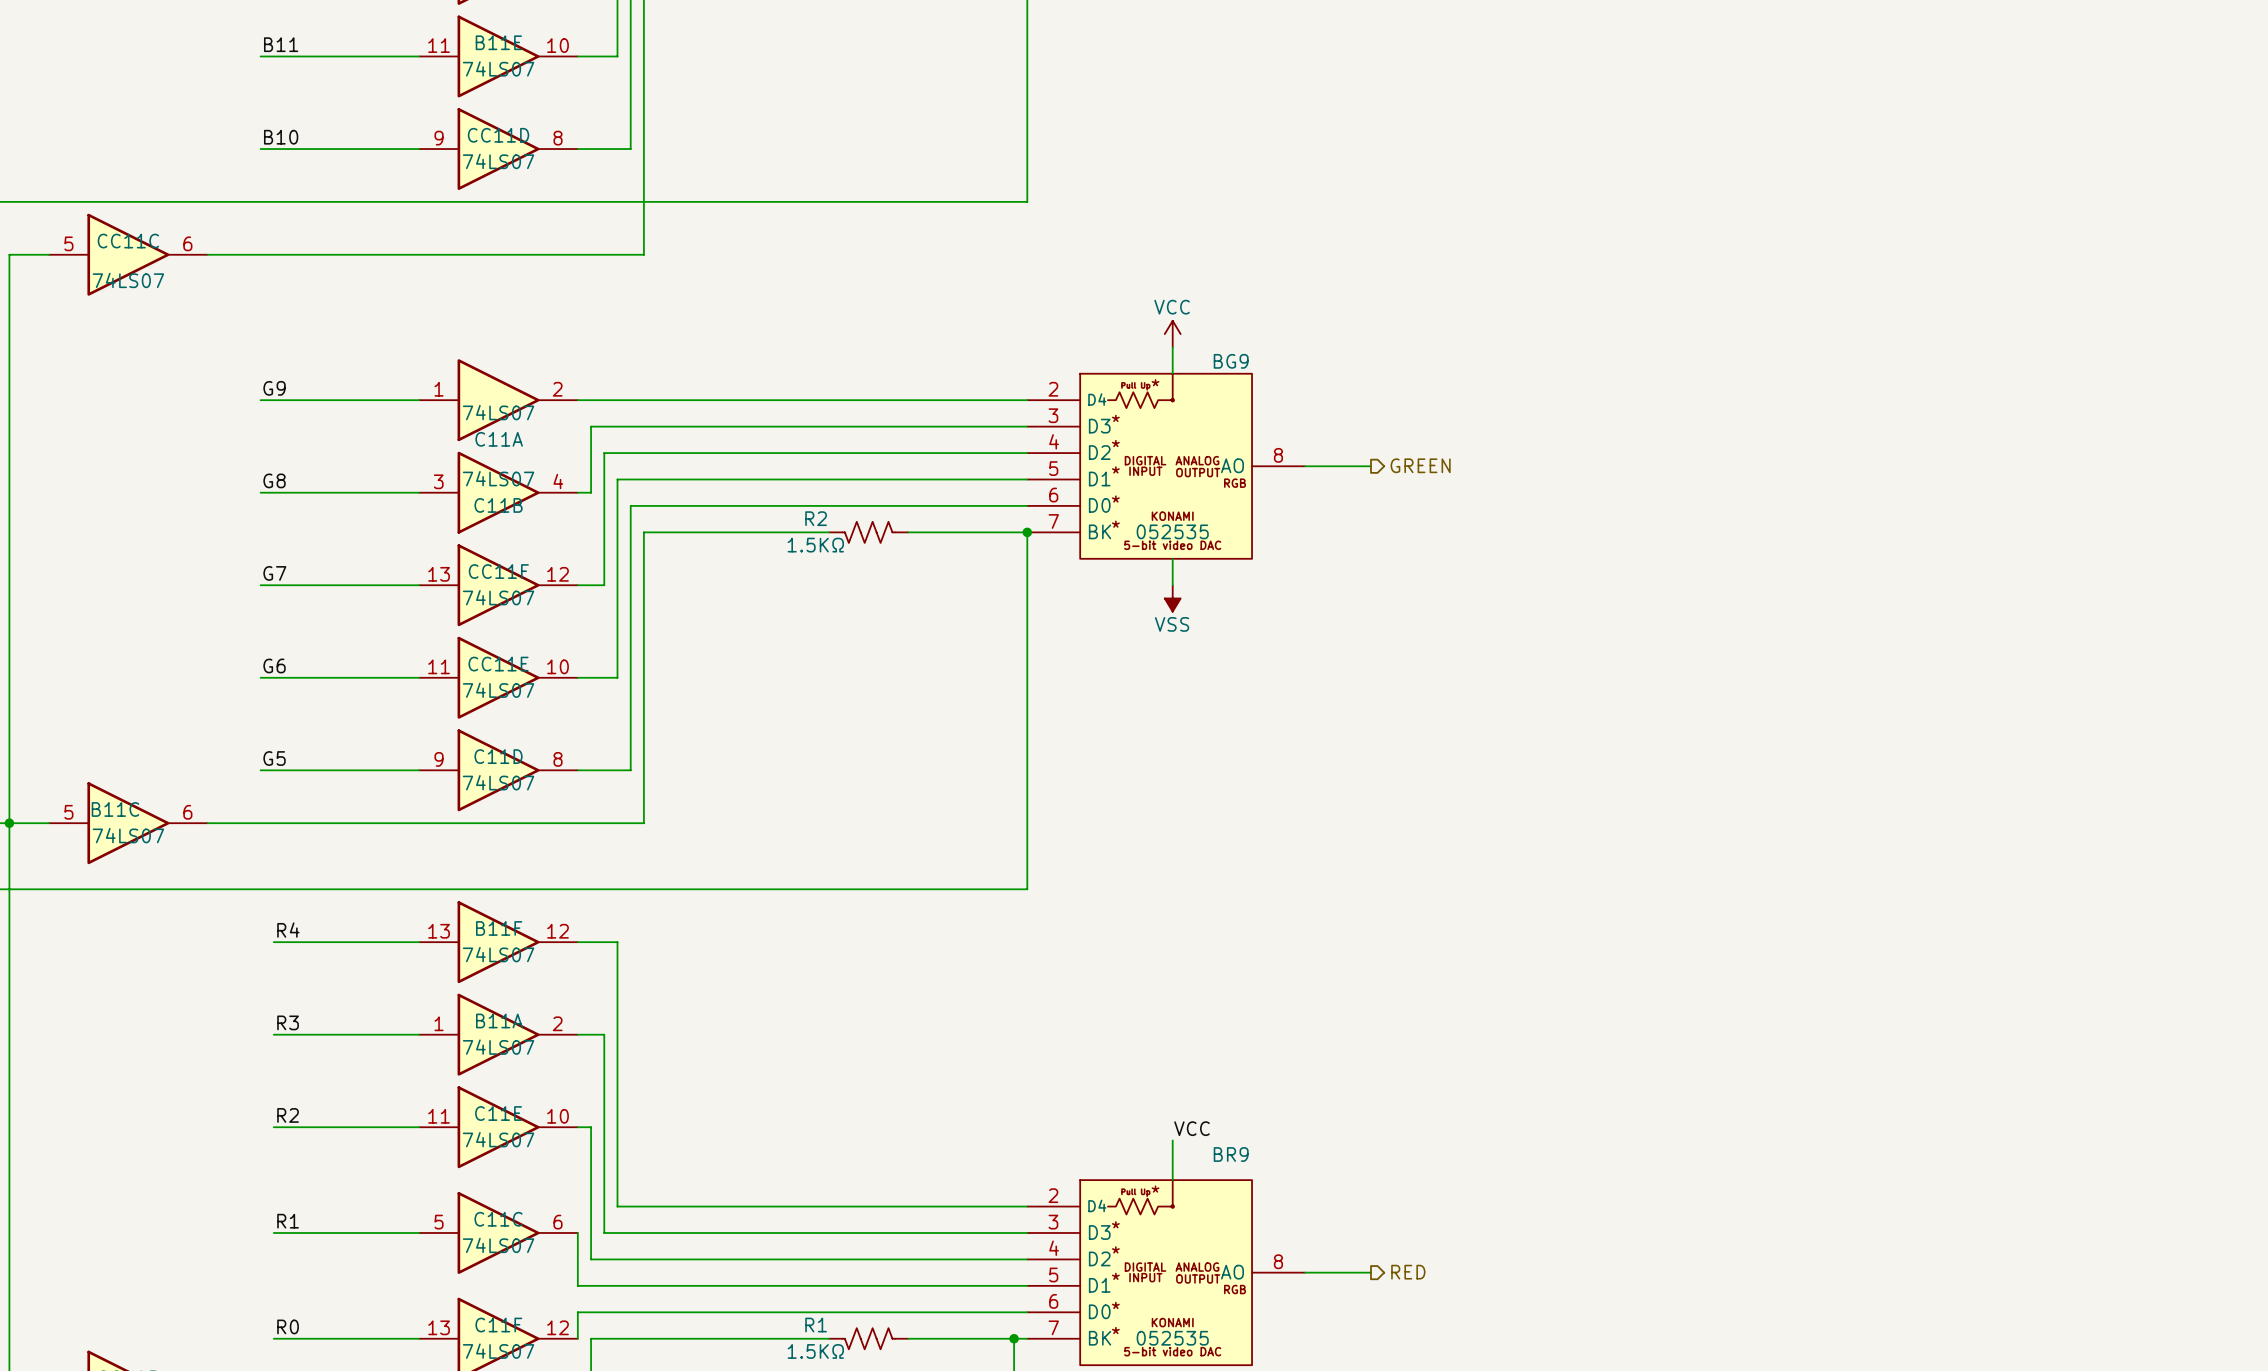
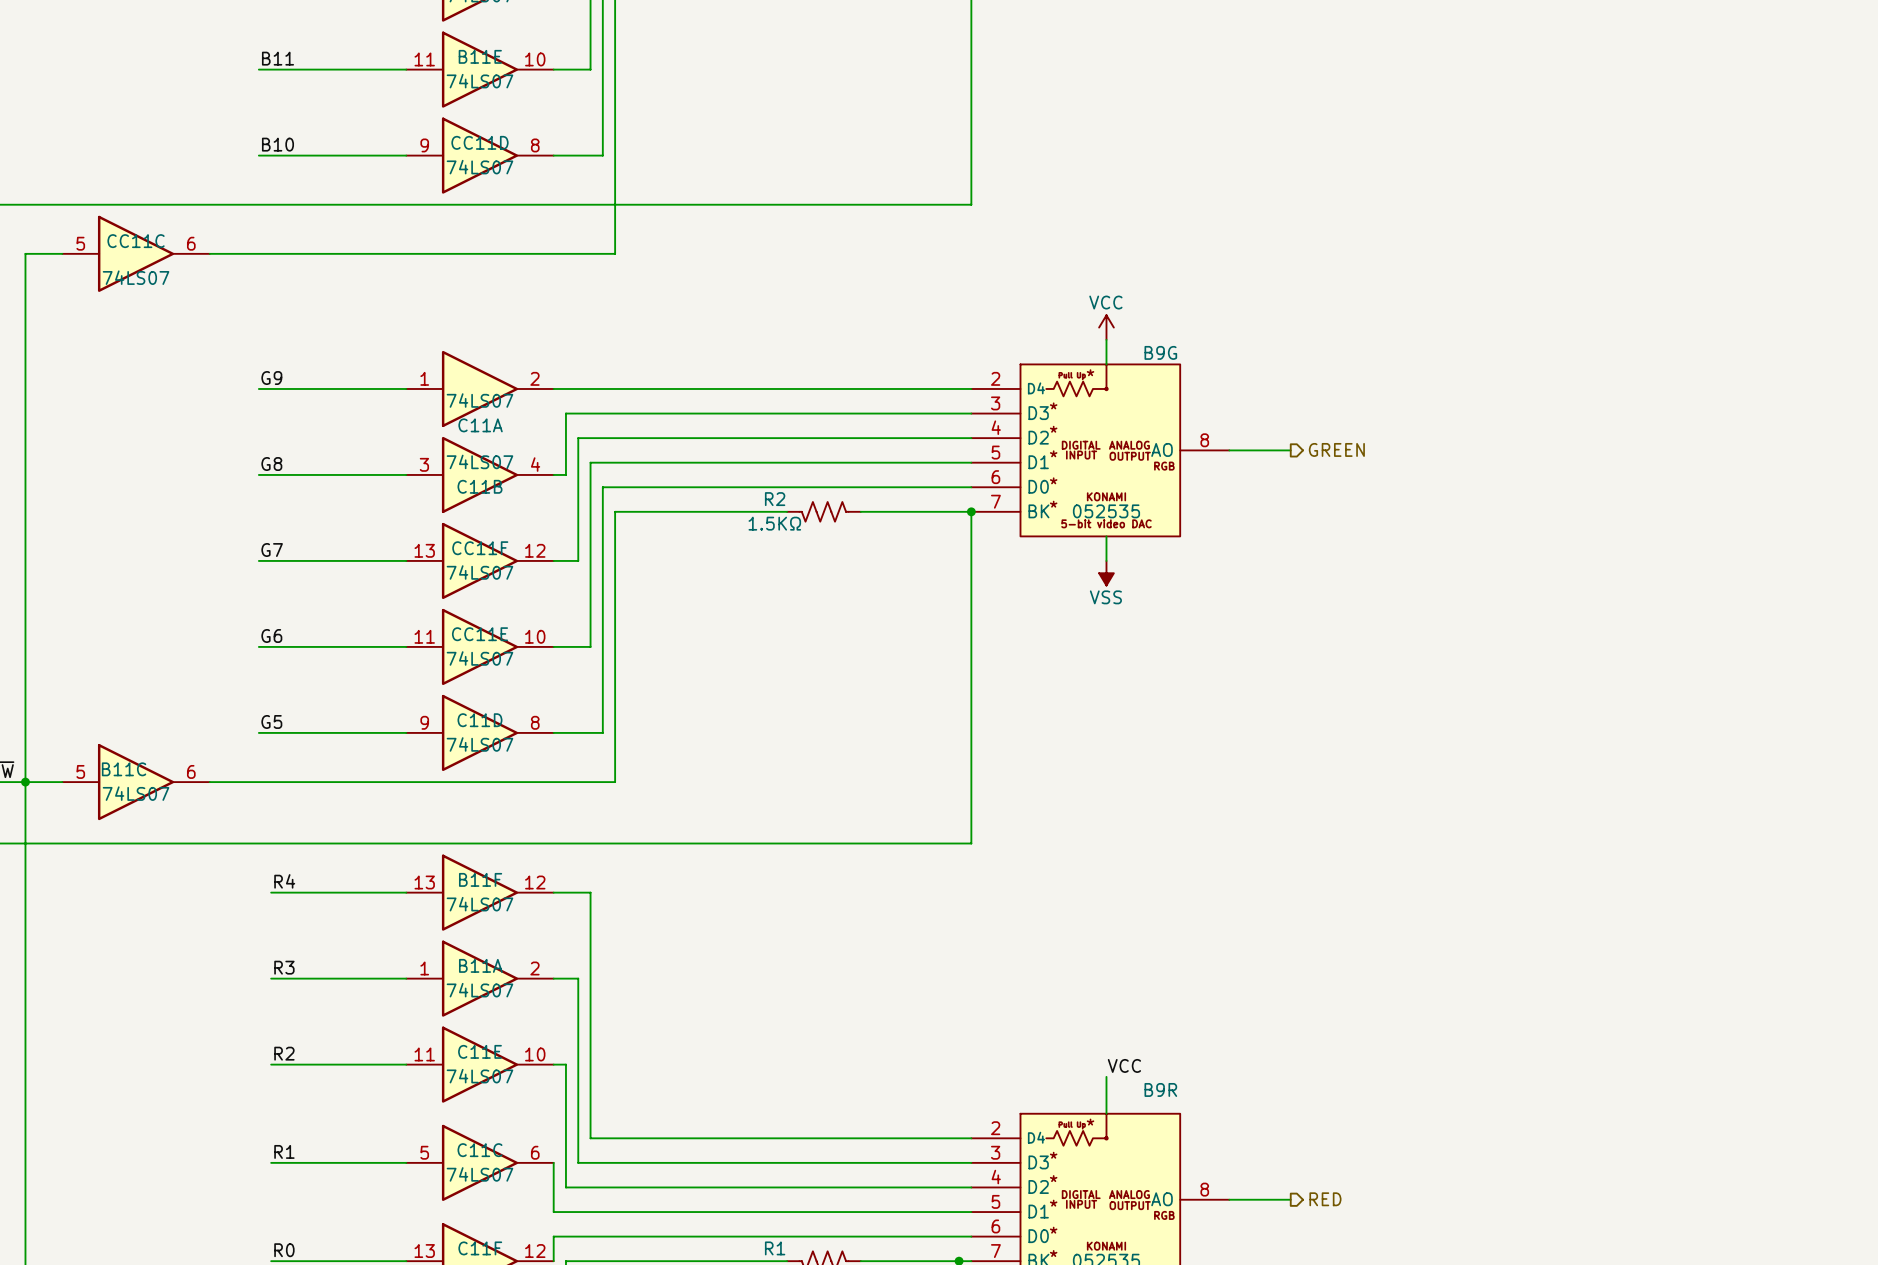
BG9 name: BG9 (1231, 361) -> B9G (1160, 352)
BR9 name: BR9 (1231, 1154) -> B9R (1160, 1089)

